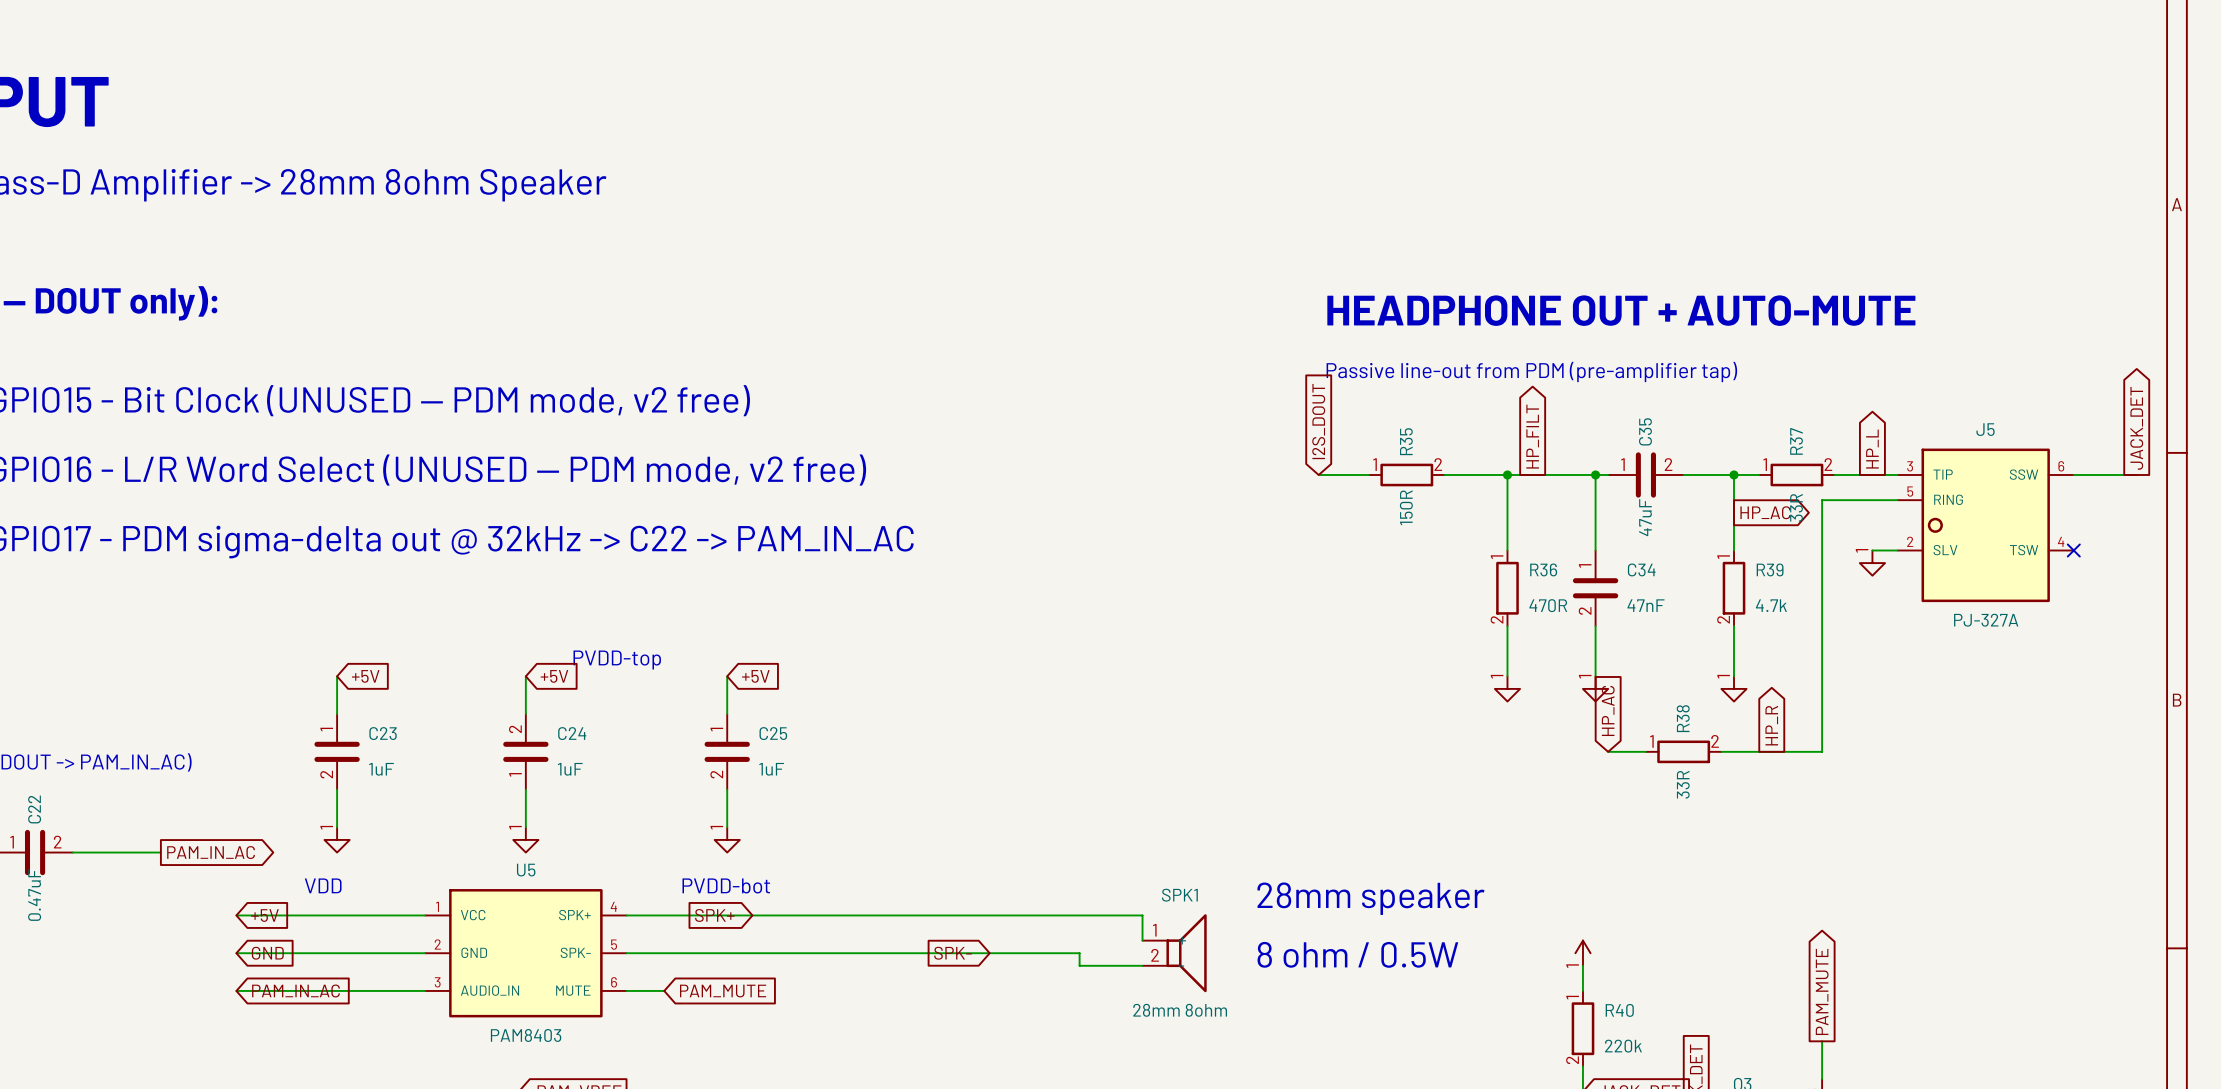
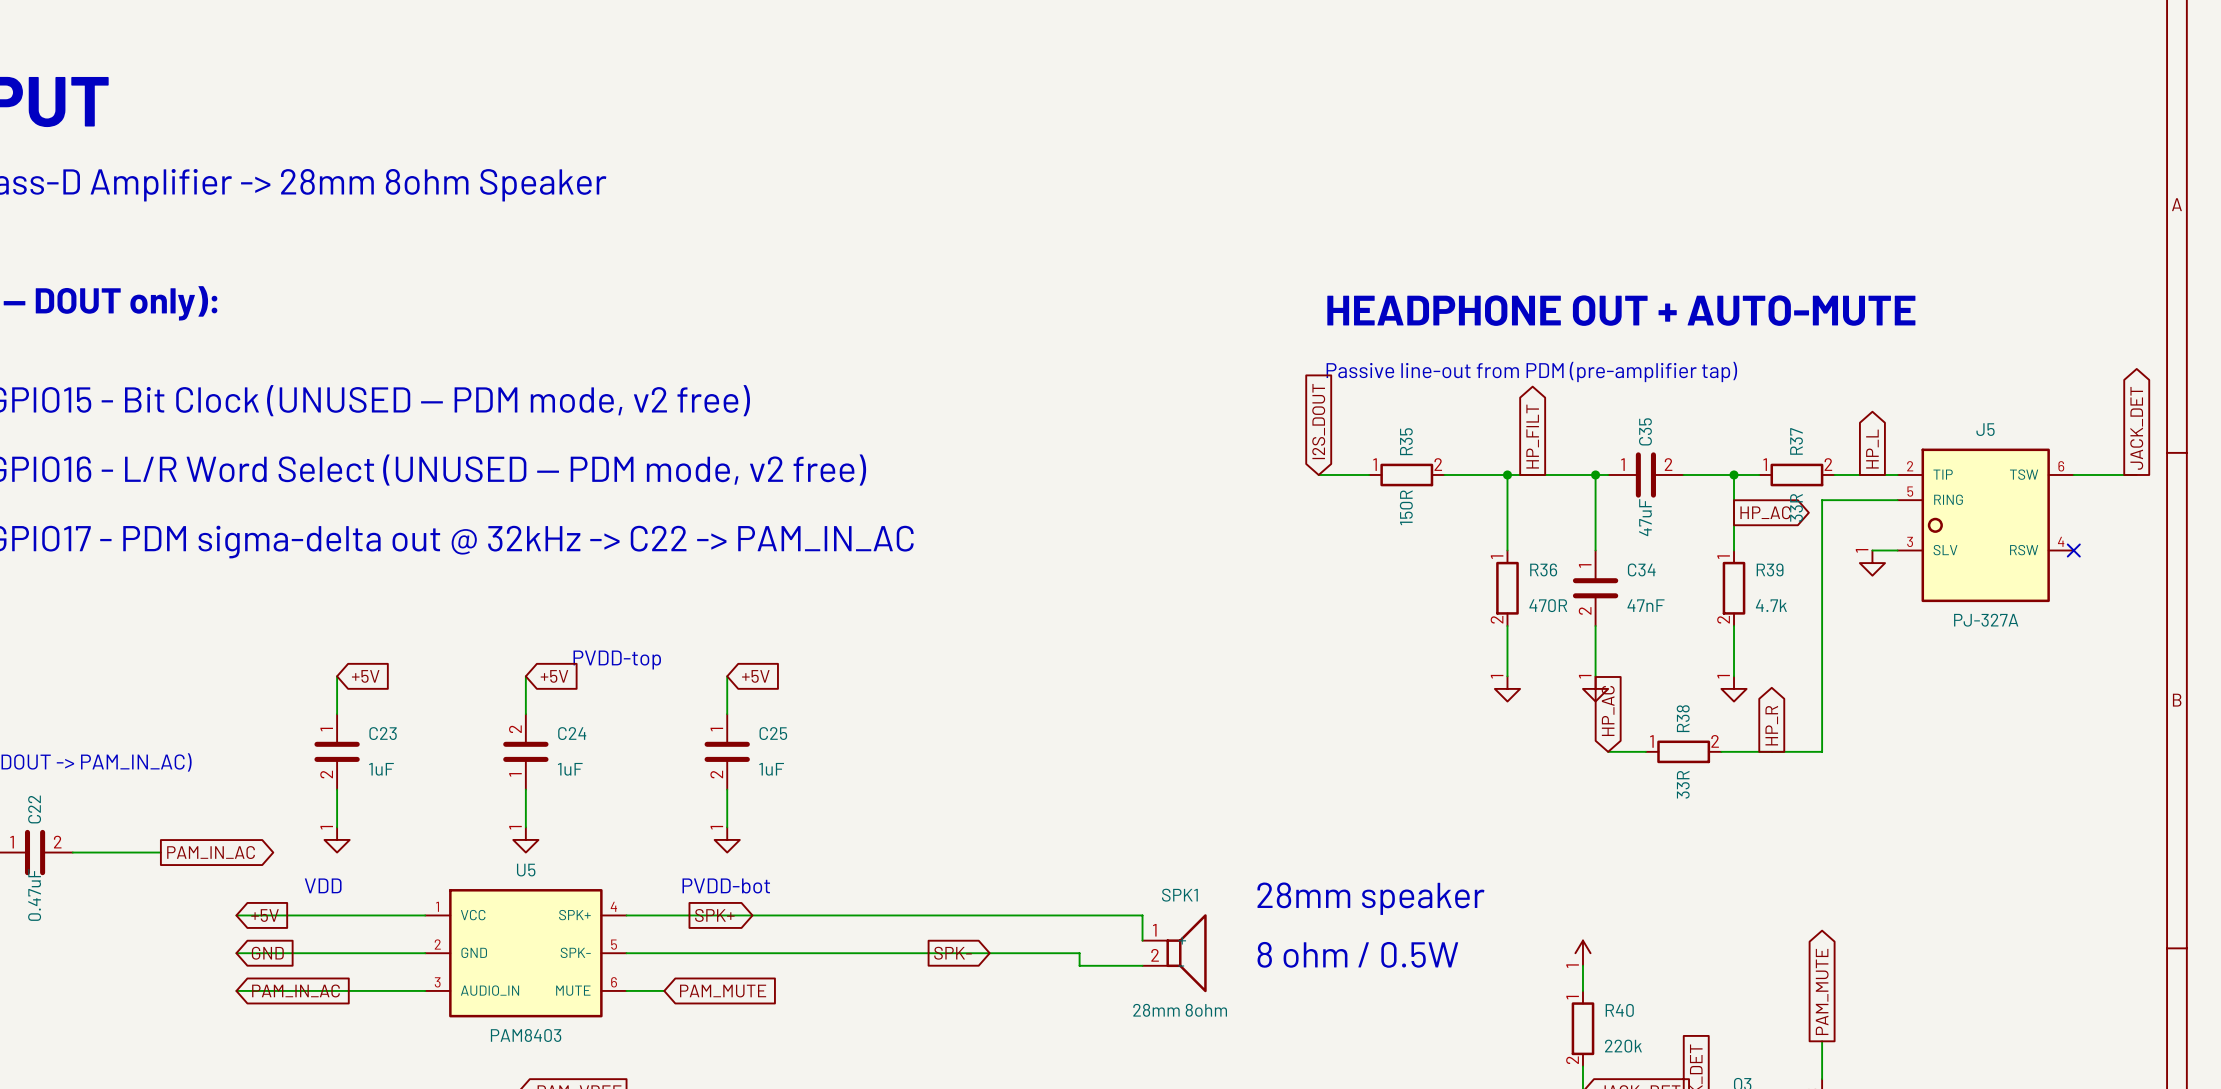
J5 pin number: 3 (1910, 466) -> 2 (1910, 466)
J5 pin name: SSW (2024, 474) -> TSW (2024, 474)
J5 pin number: 2 (1910, 541) -> 3 (1910, 541)
J5 pin name: TSW (2024, 550) -> RSW (2024, 550)

